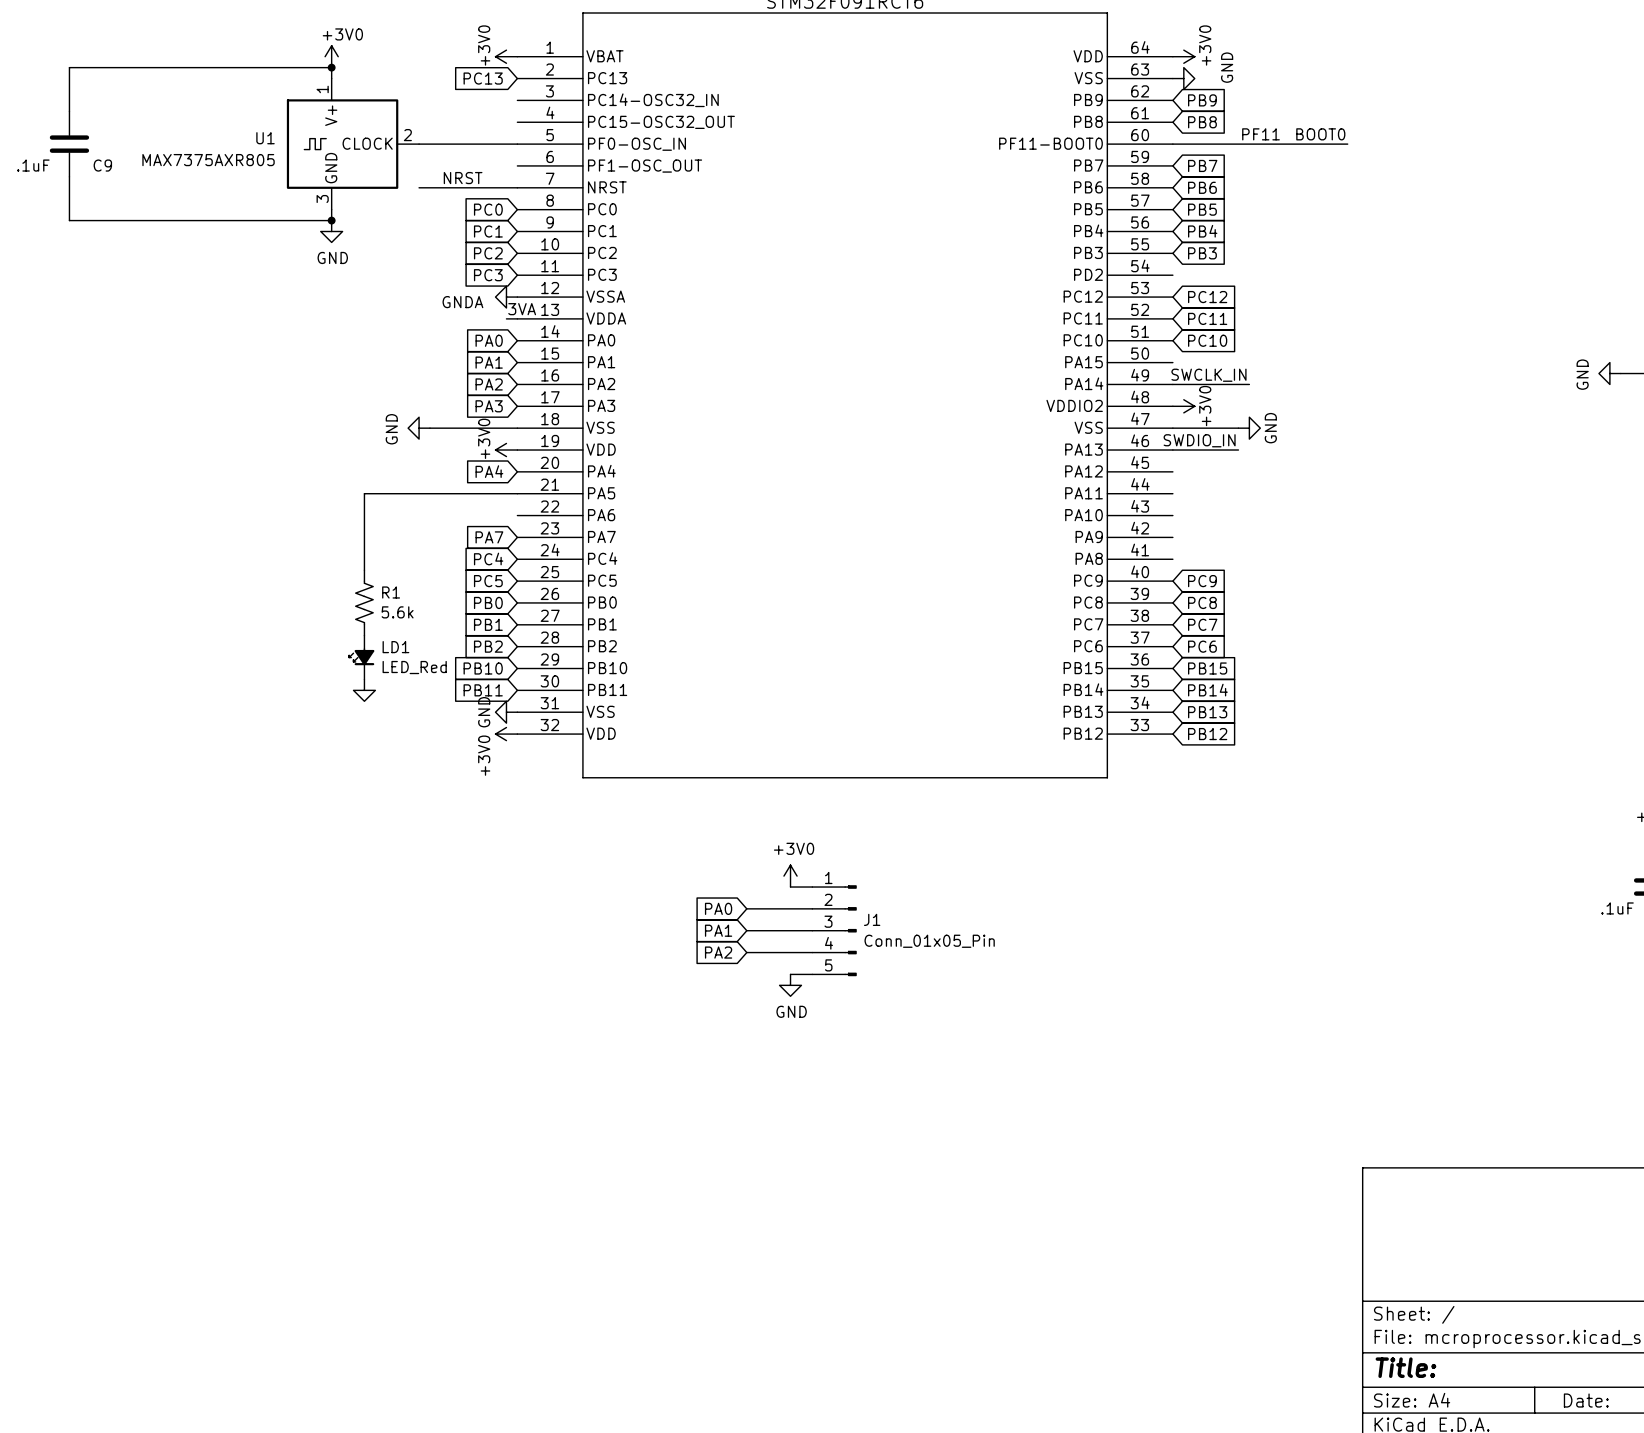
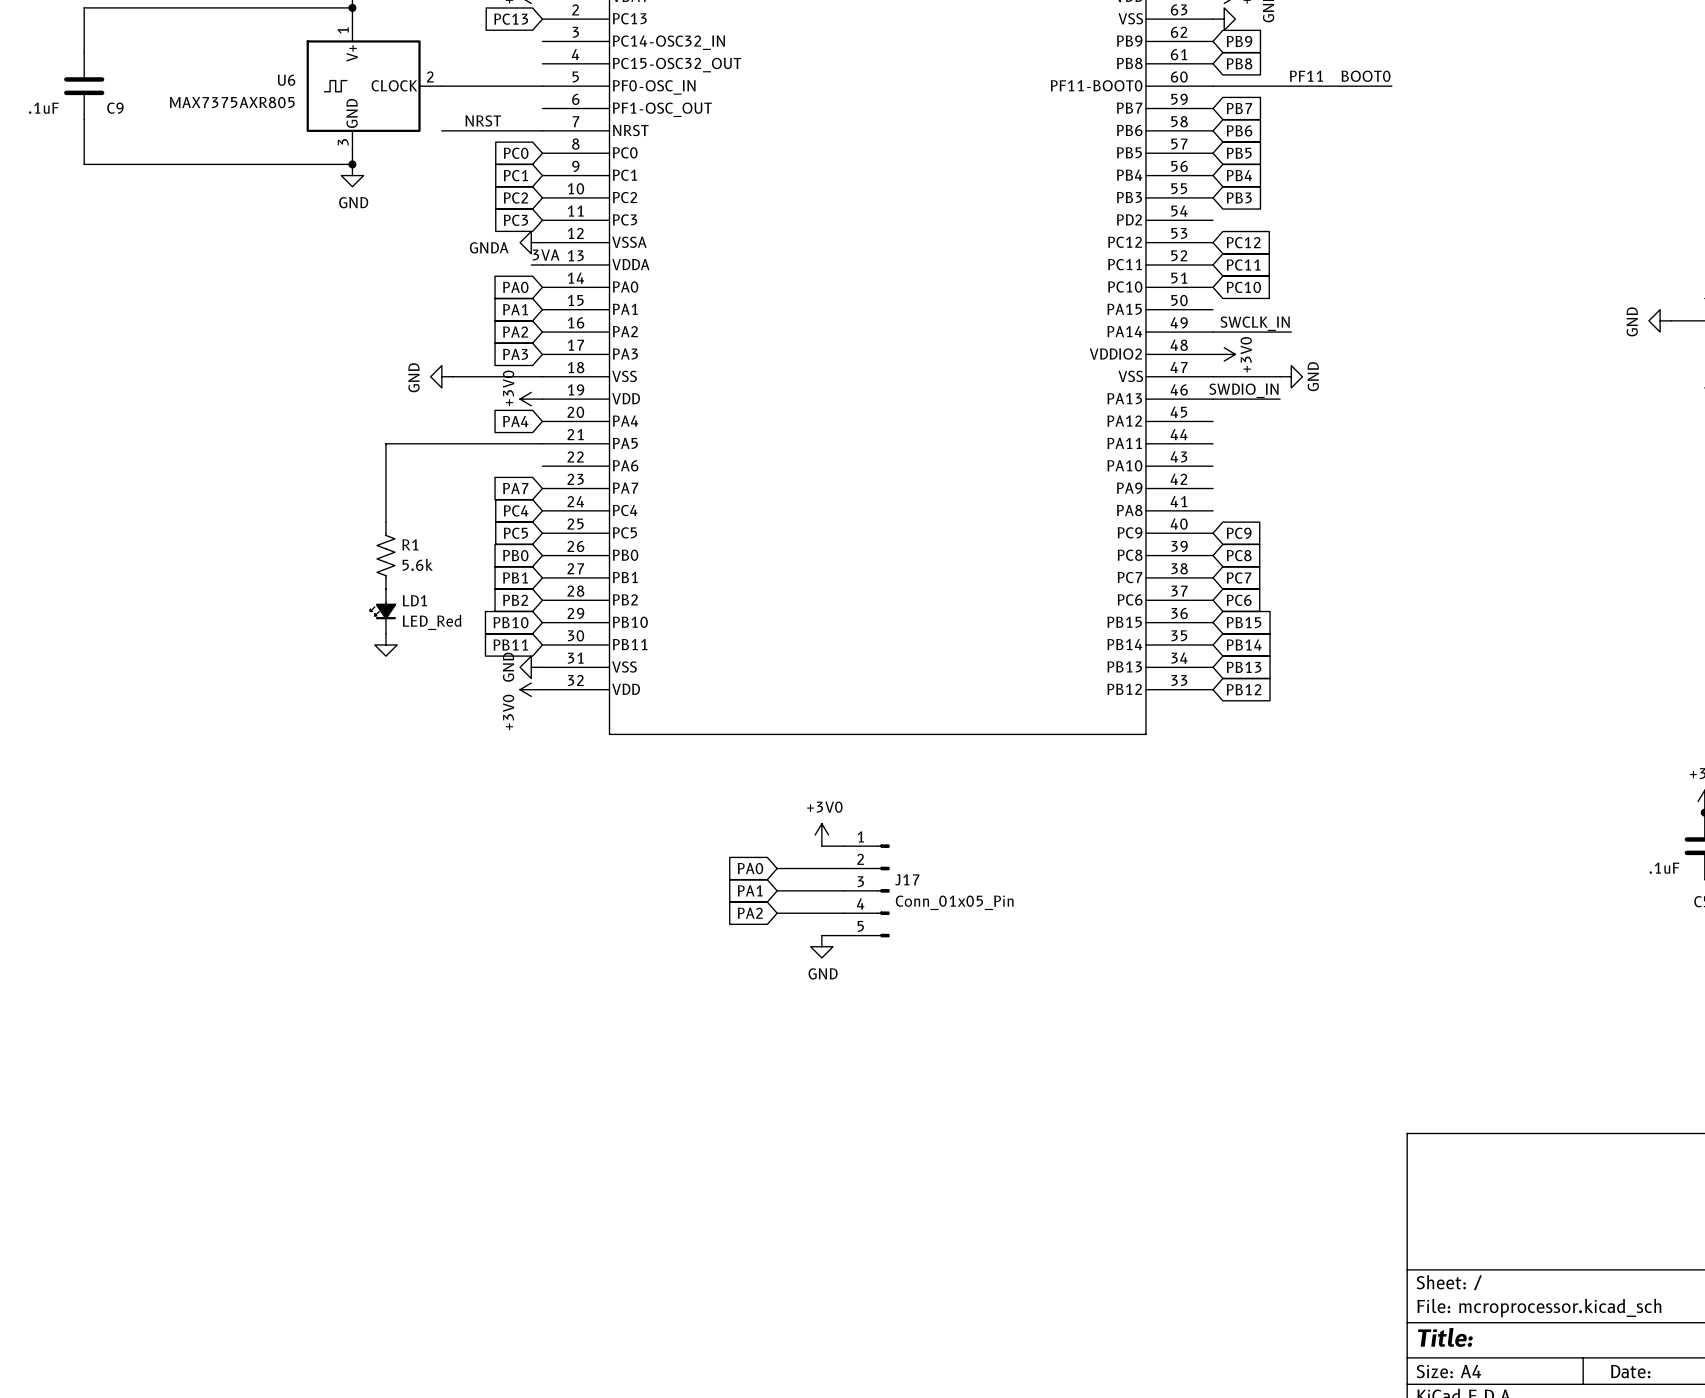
U1 name: U1 (265, 138) -> U6 (286, 80)
J1 name: J1 (872, 919) -> J17 (907, 879)

